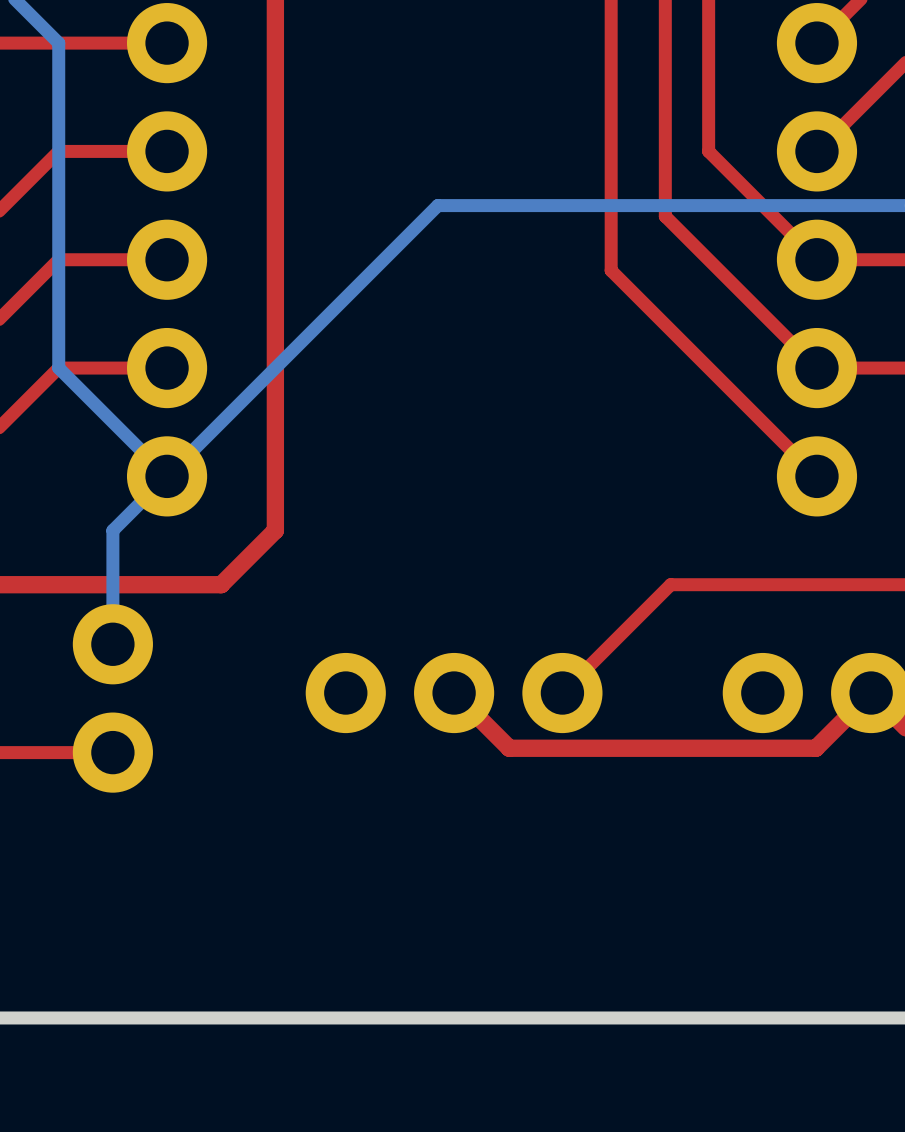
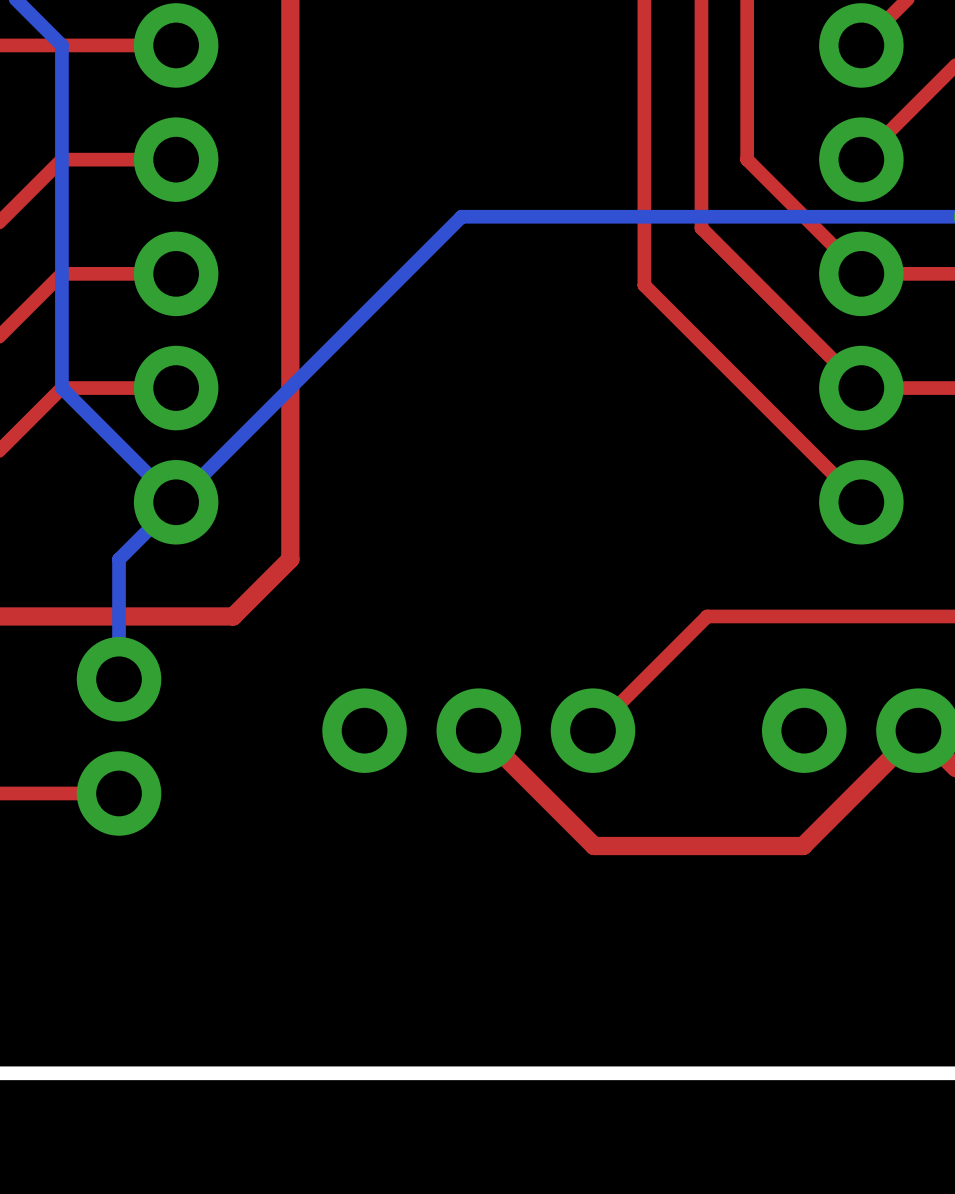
top track: (815, 748) (509, 748) -> (860, 788) (803, 846) (594, 846) (537, 788)

